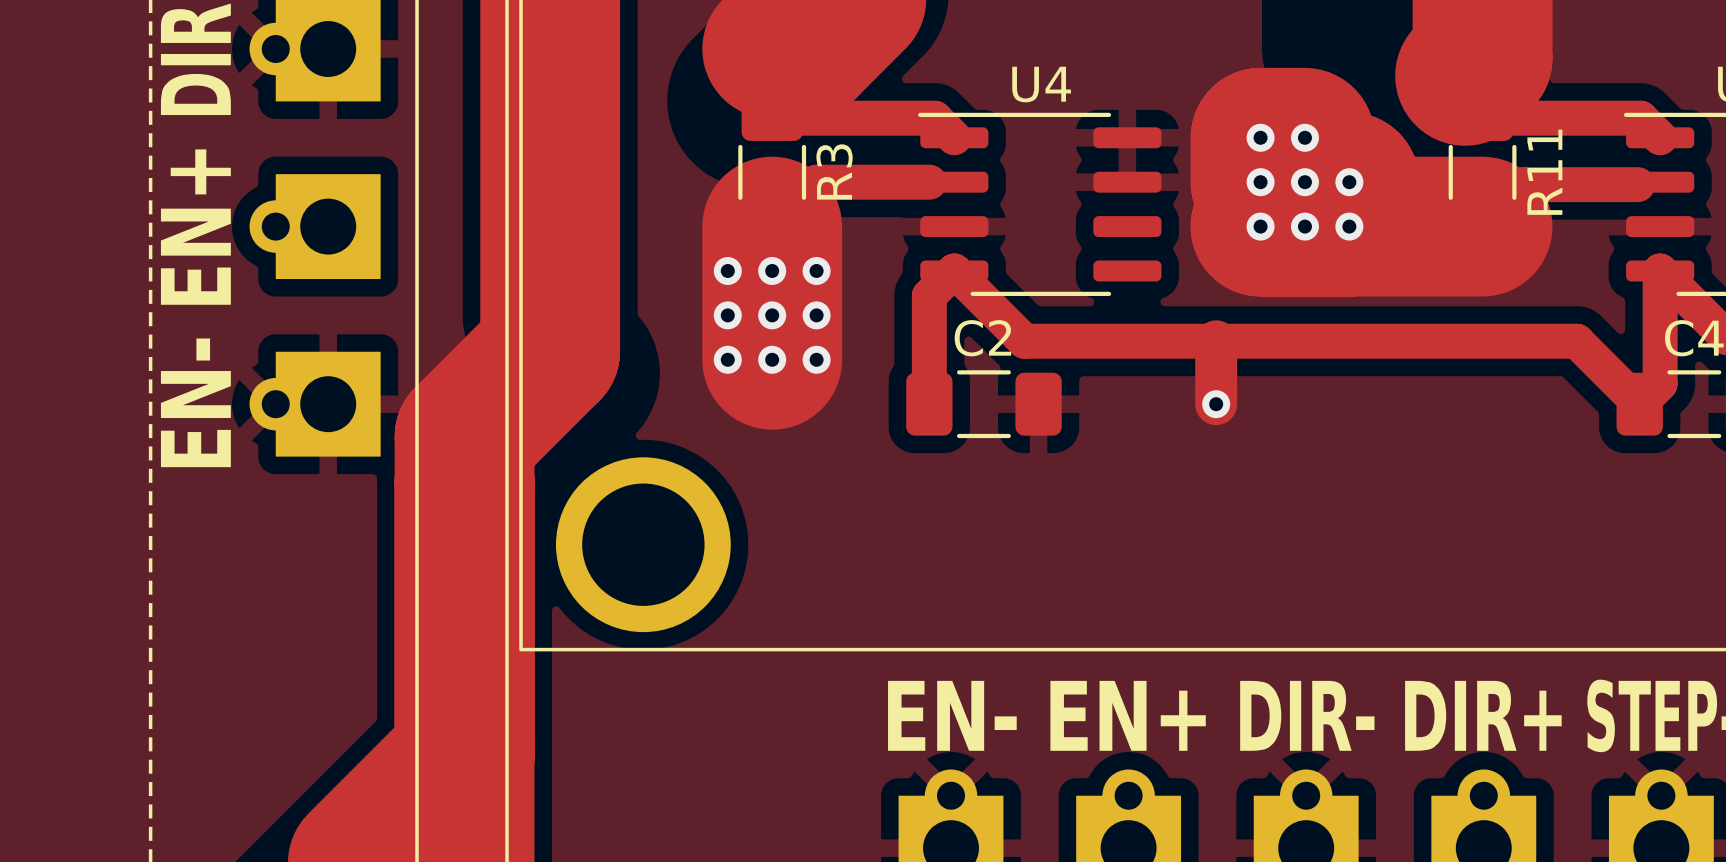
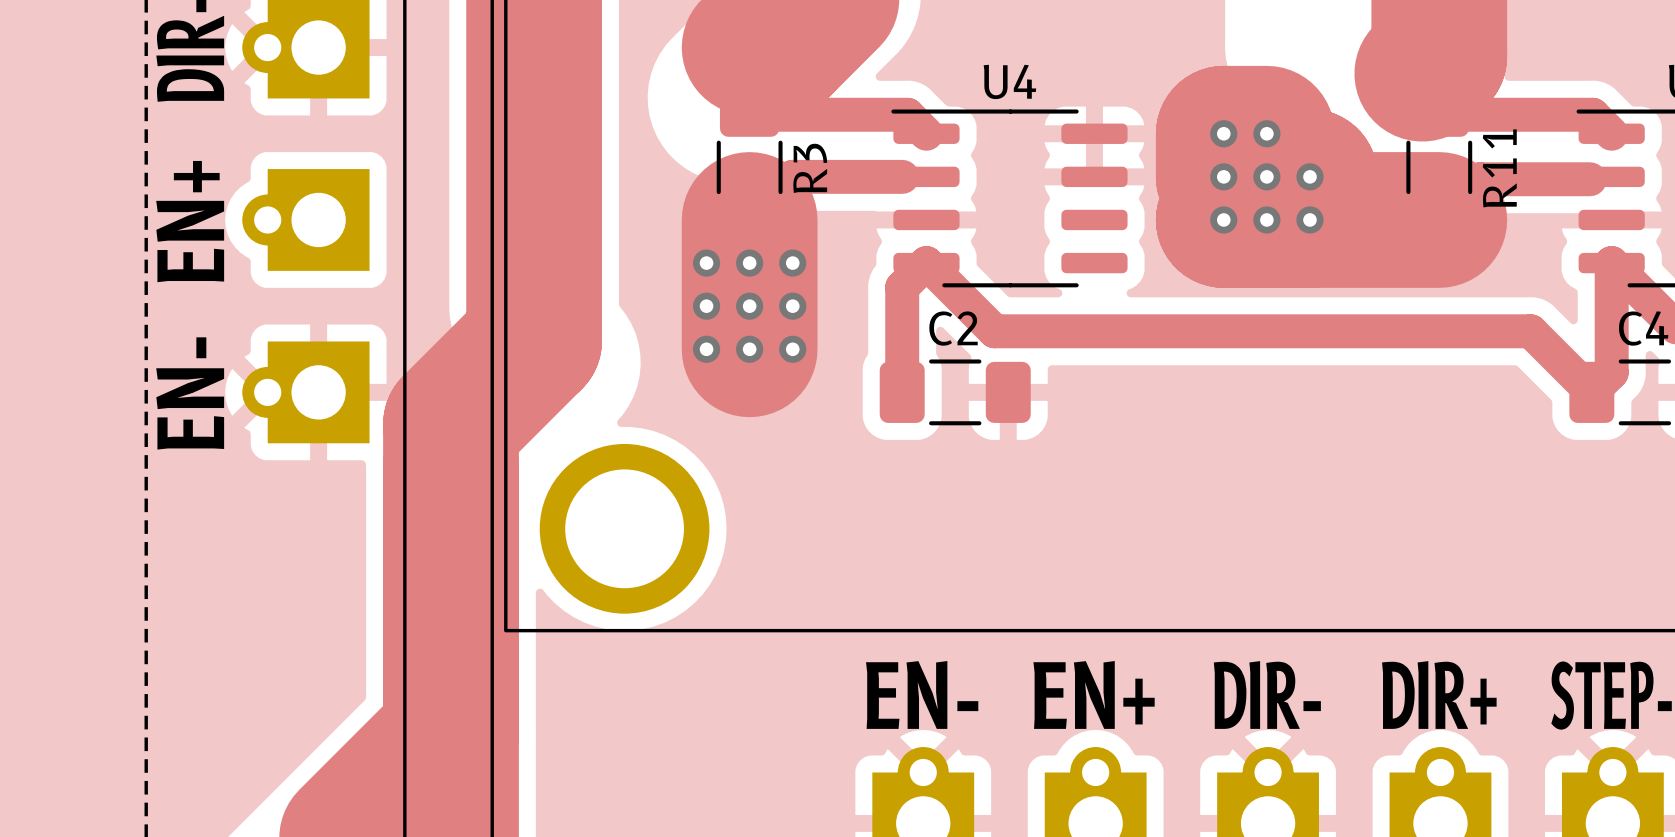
track: (1216, 341) (1216, 404) -> none
via: (1216, 404) -> none

